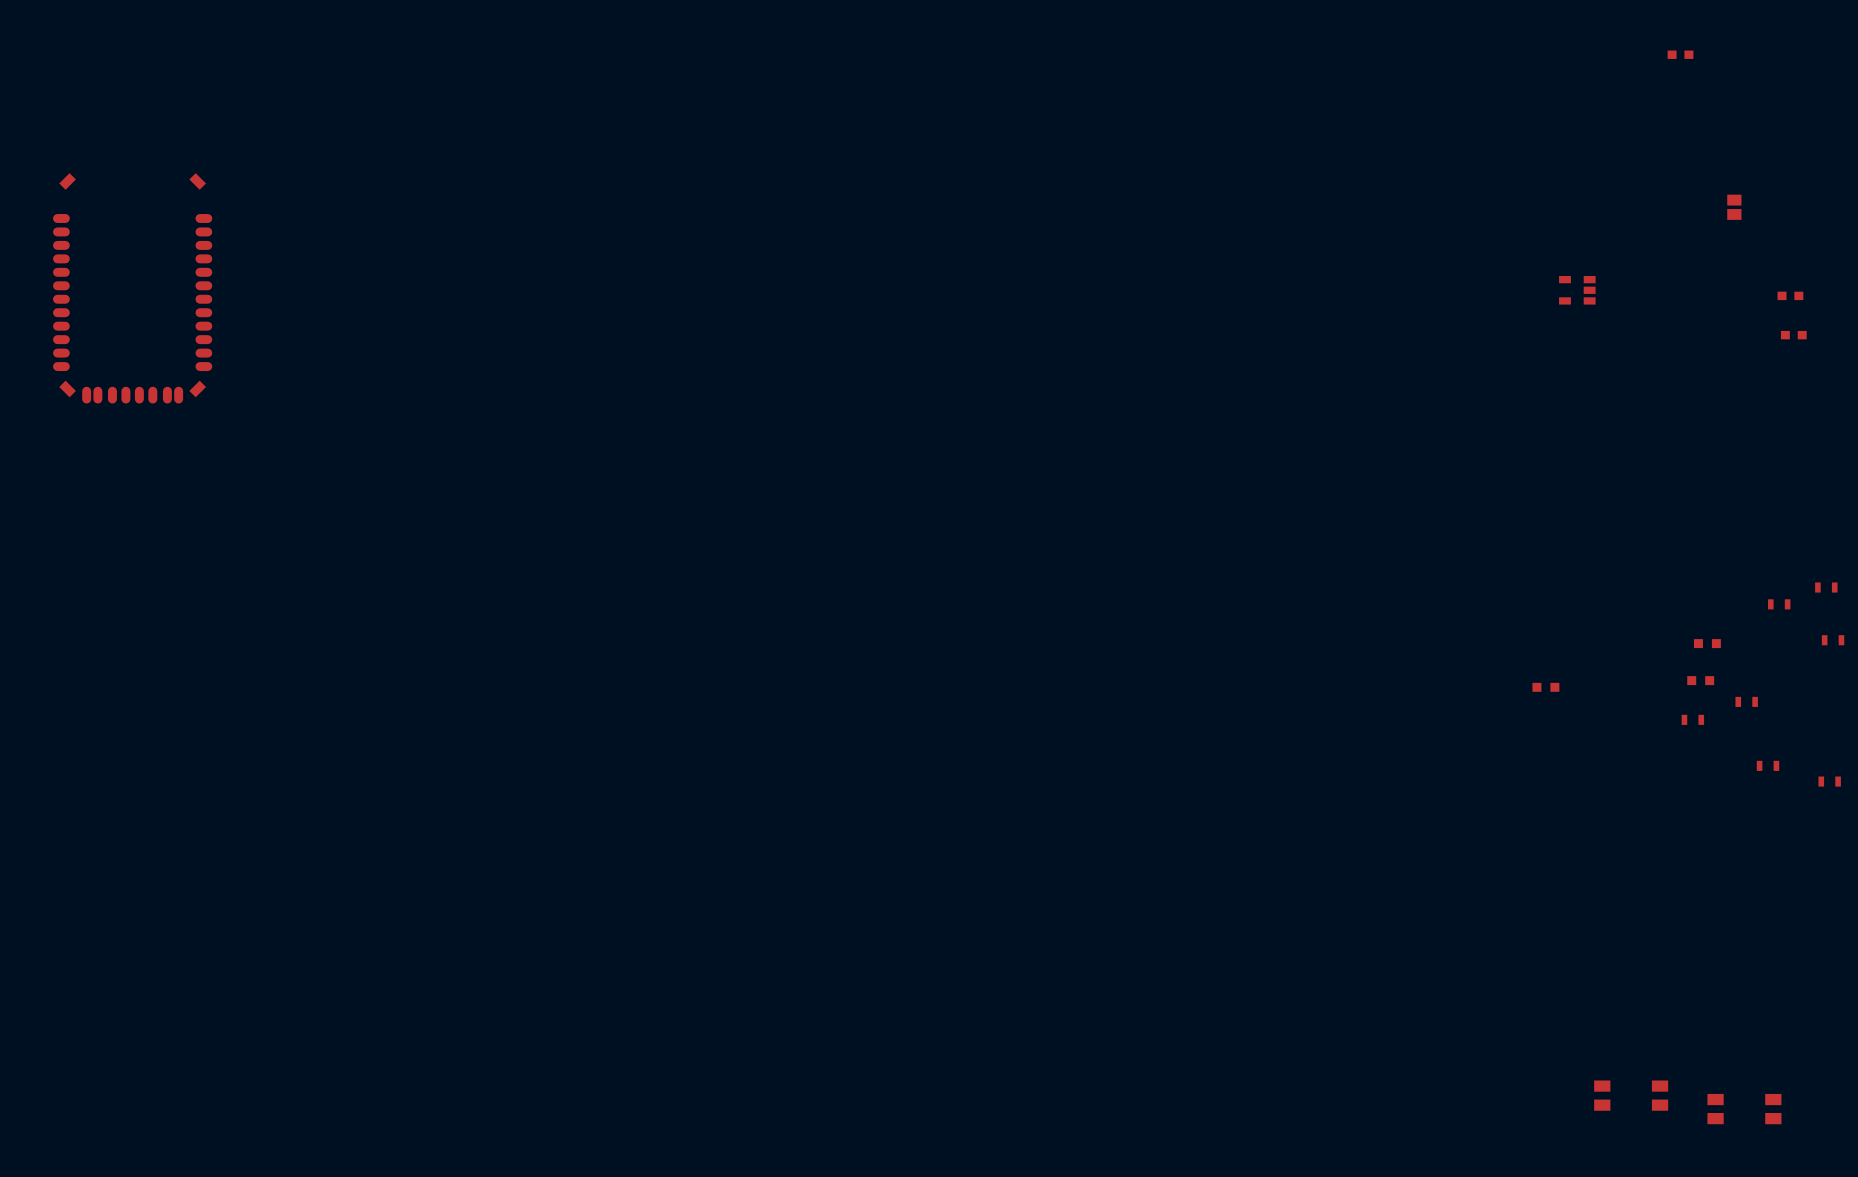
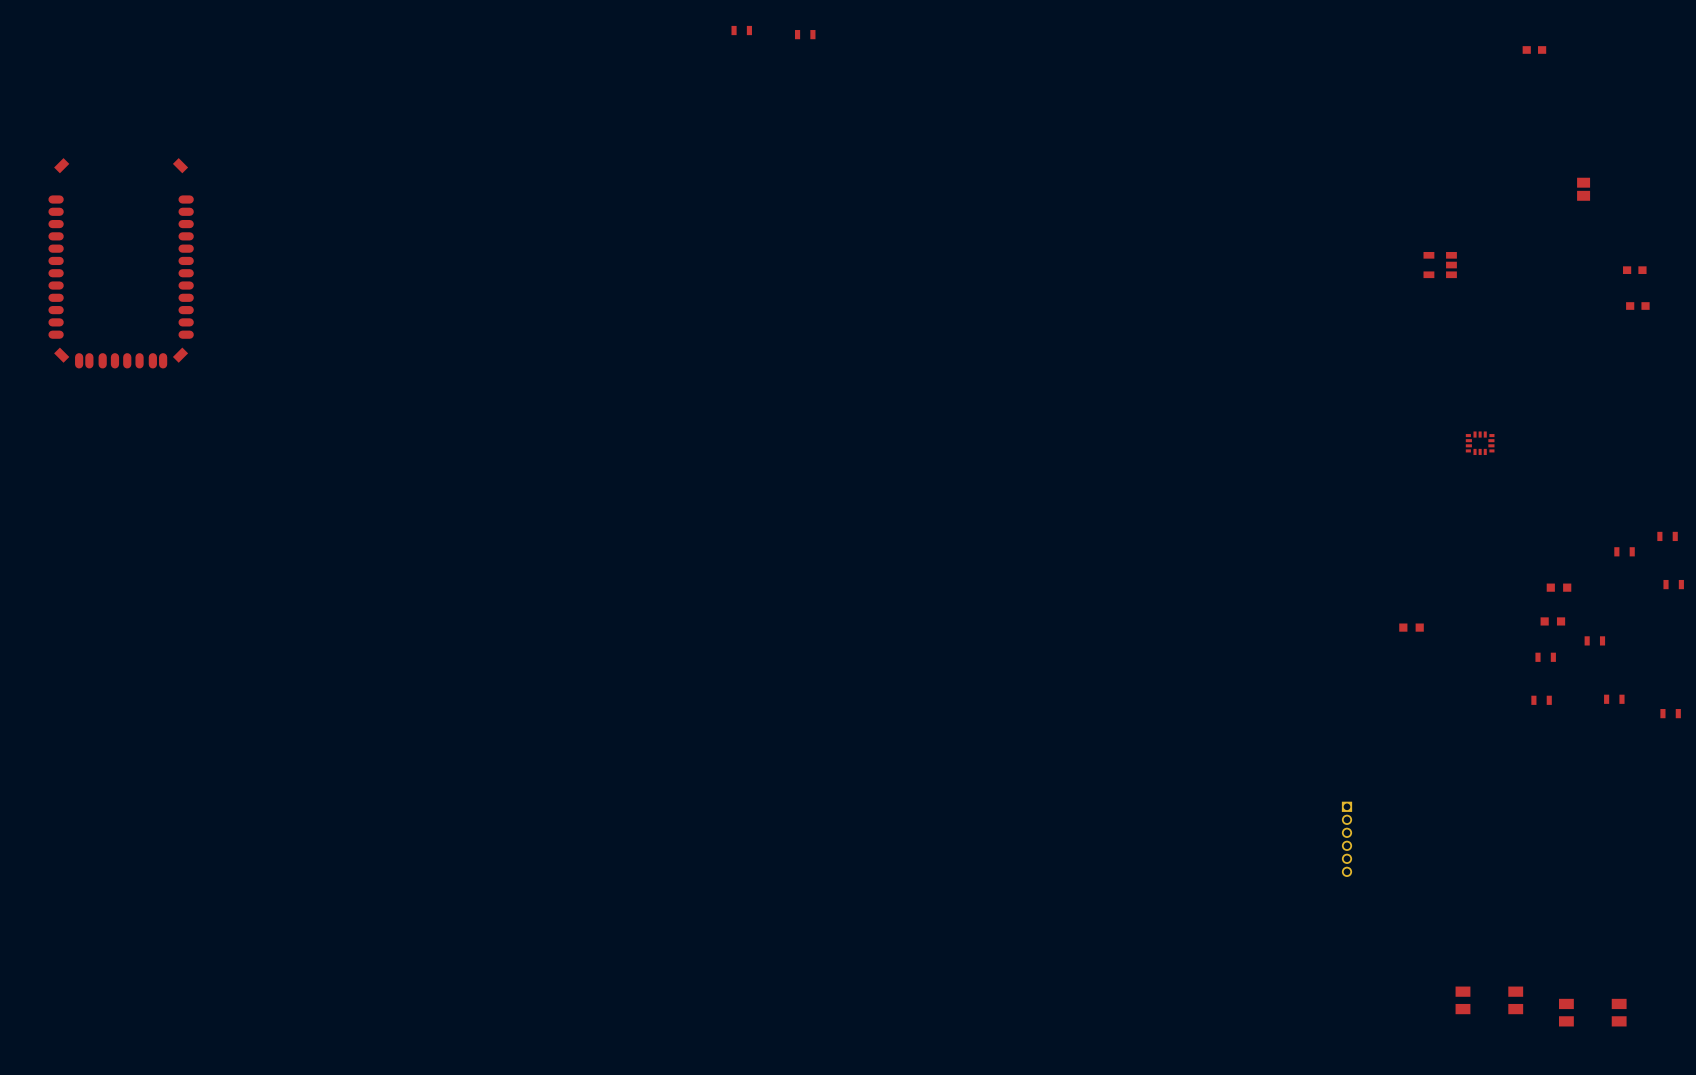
part: none -> (741, 30)
part: none -> (805, 34)
part: none -> (1480, 443)
part: none -> (1541, 700)
part: none -> (1347, 839)

